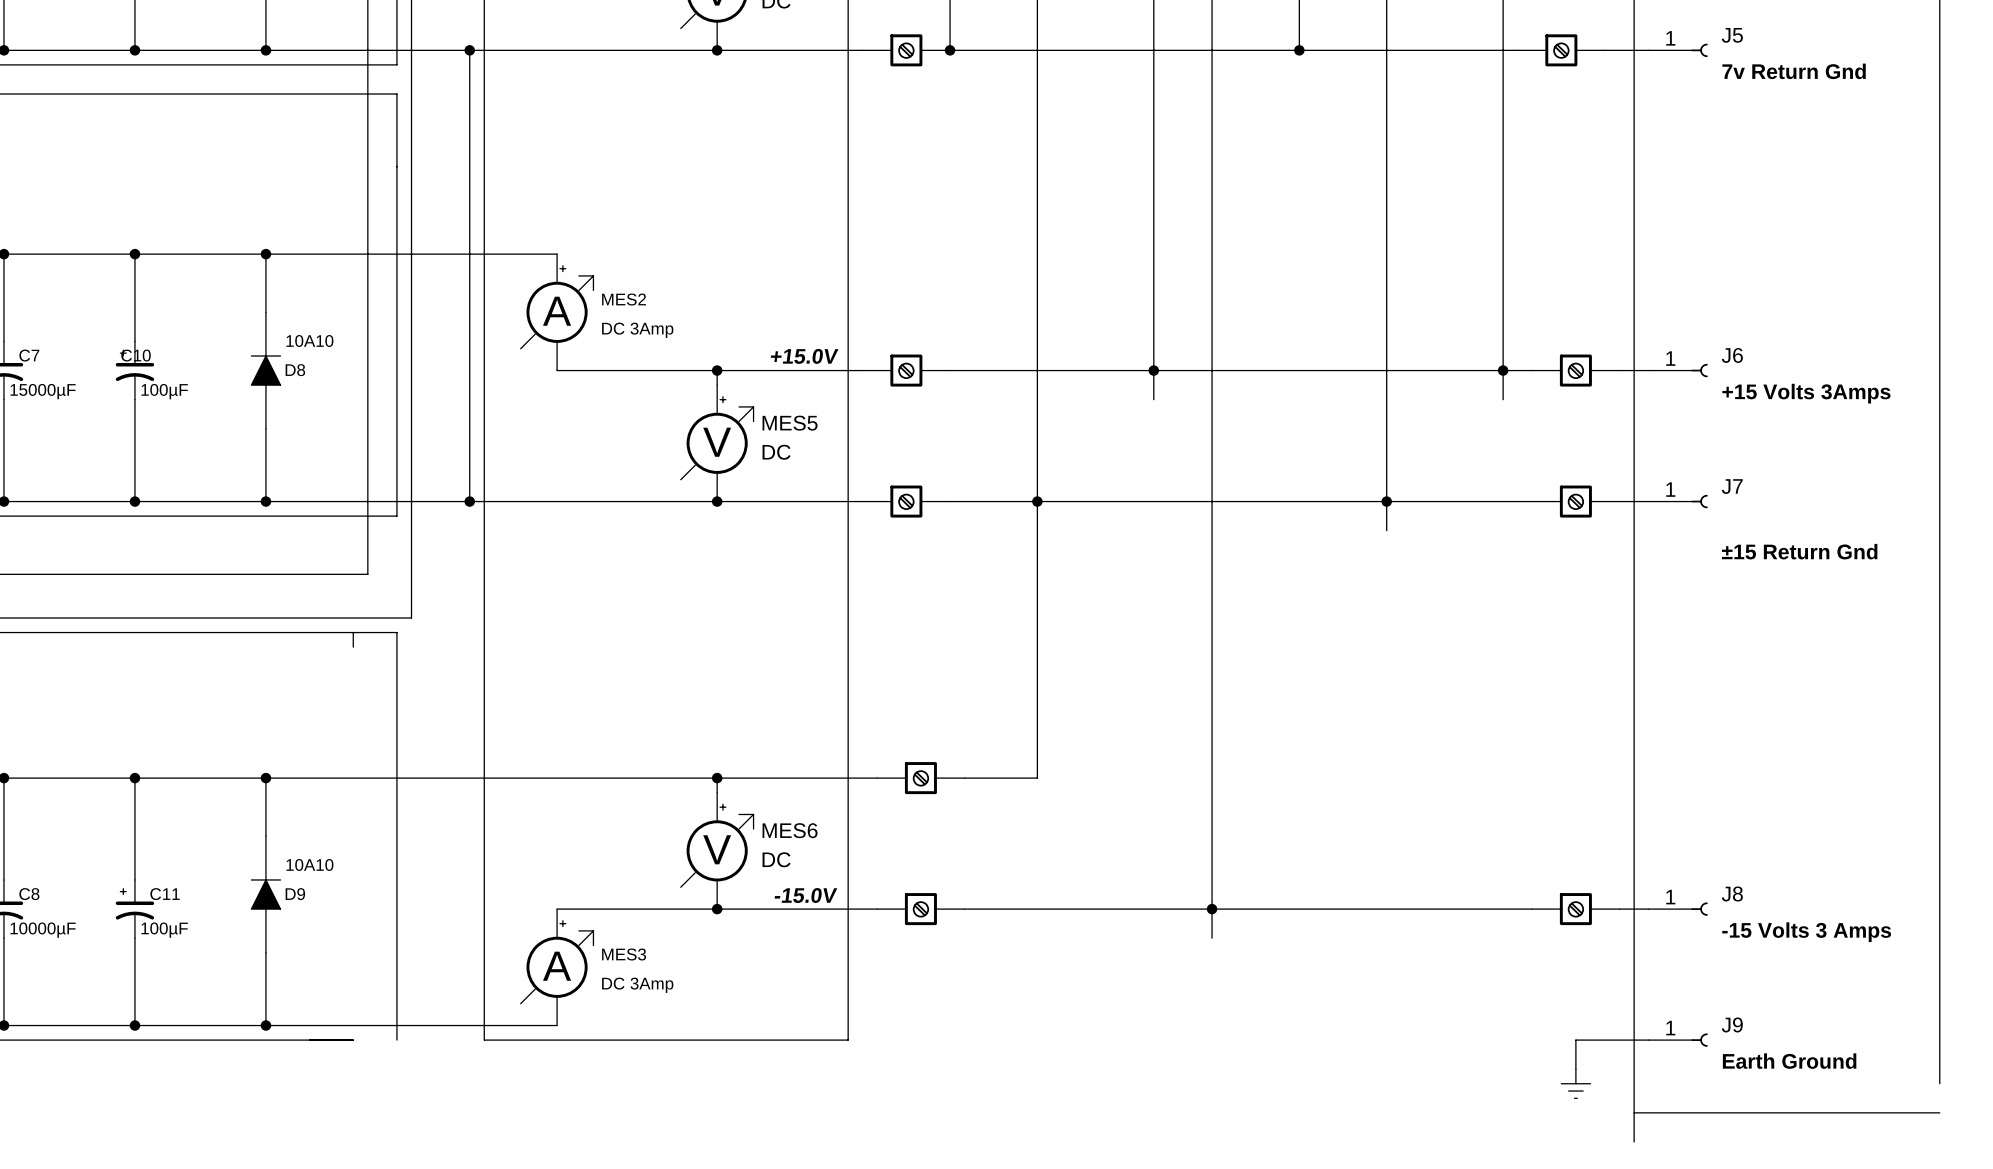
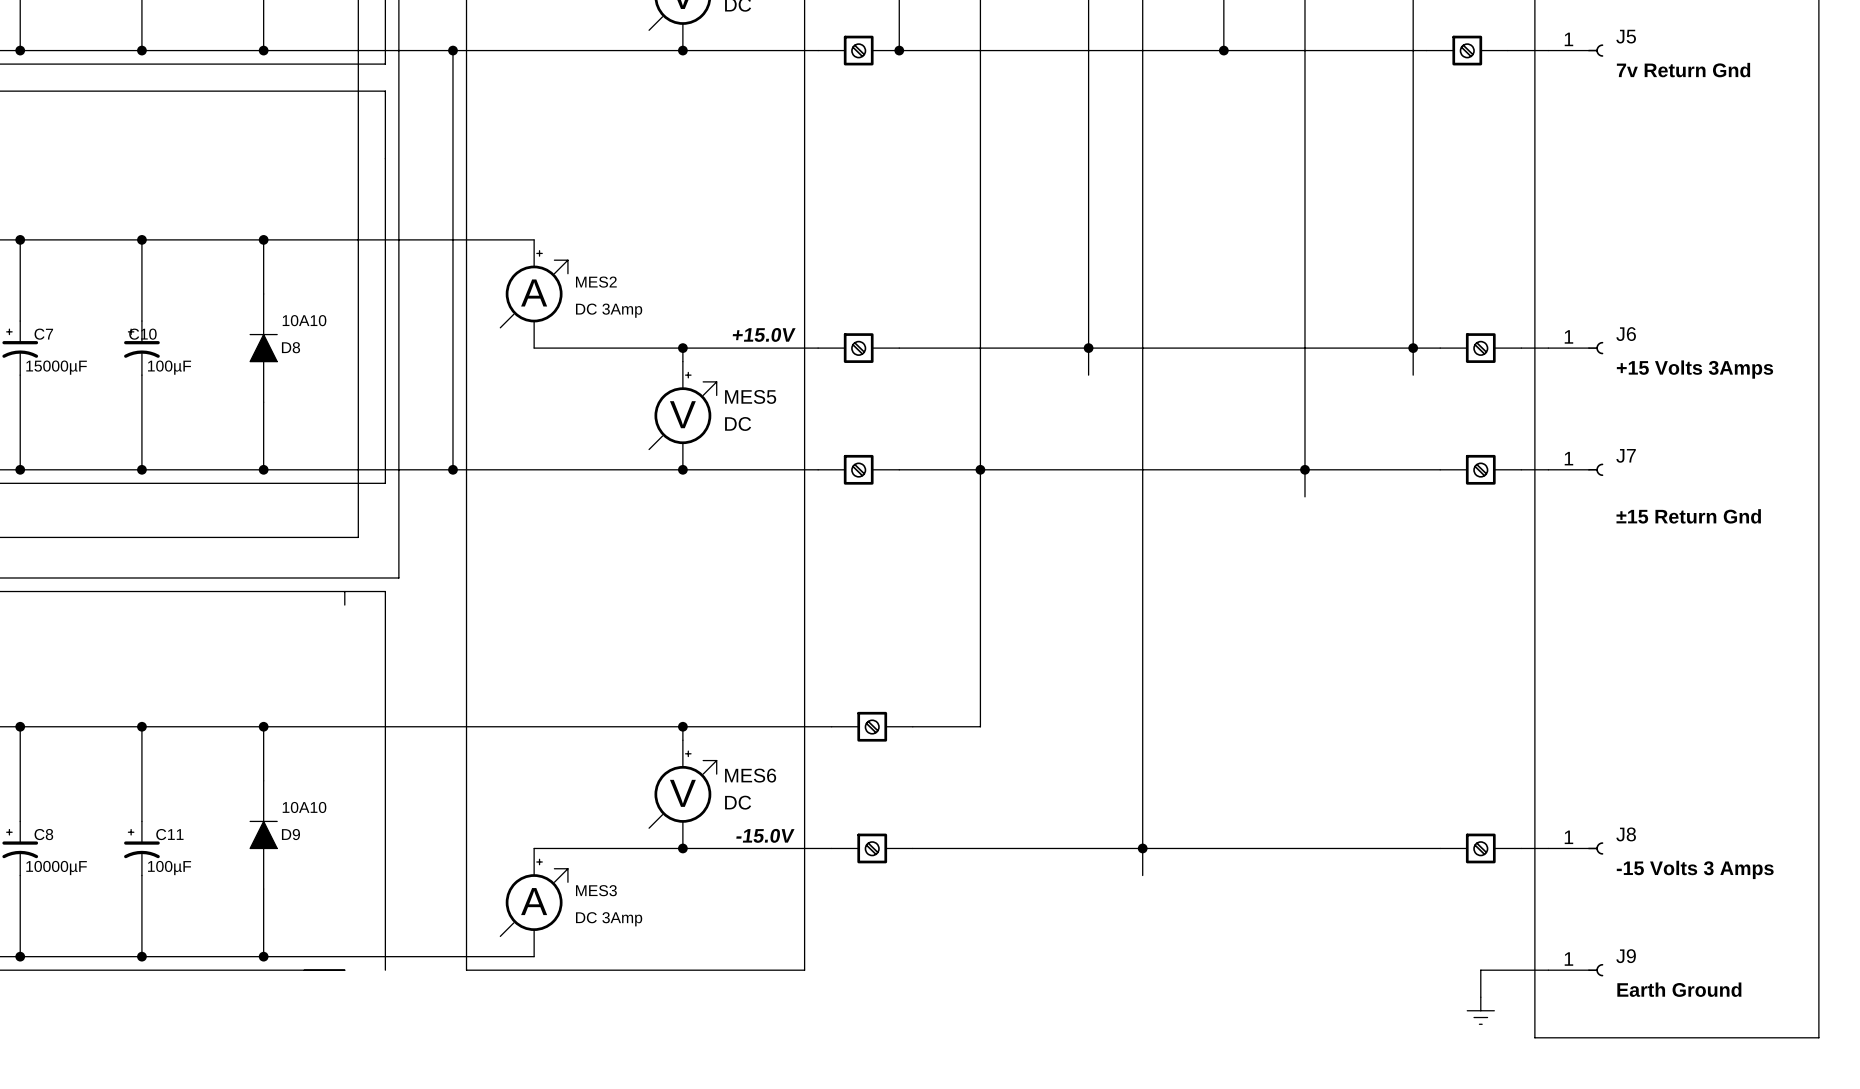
line: none -> (1818, 1010) (1818, 1037)
line: (1634, 1112) (1634, 1141) -> none

